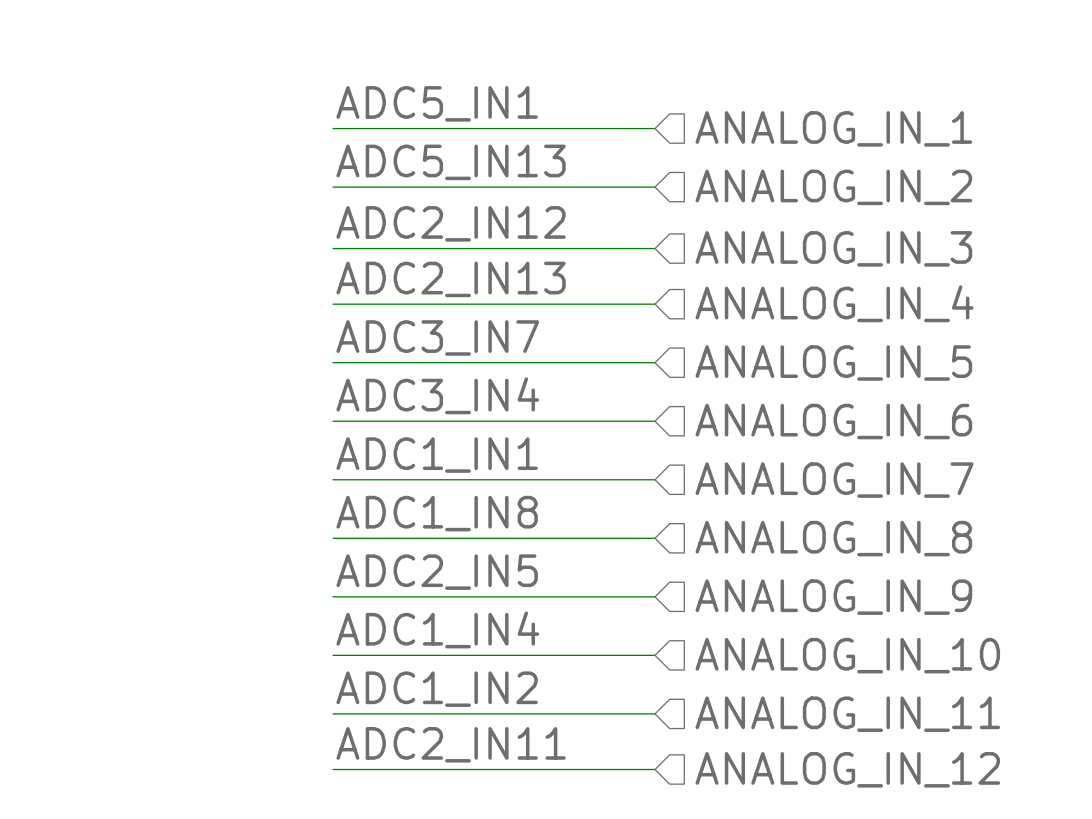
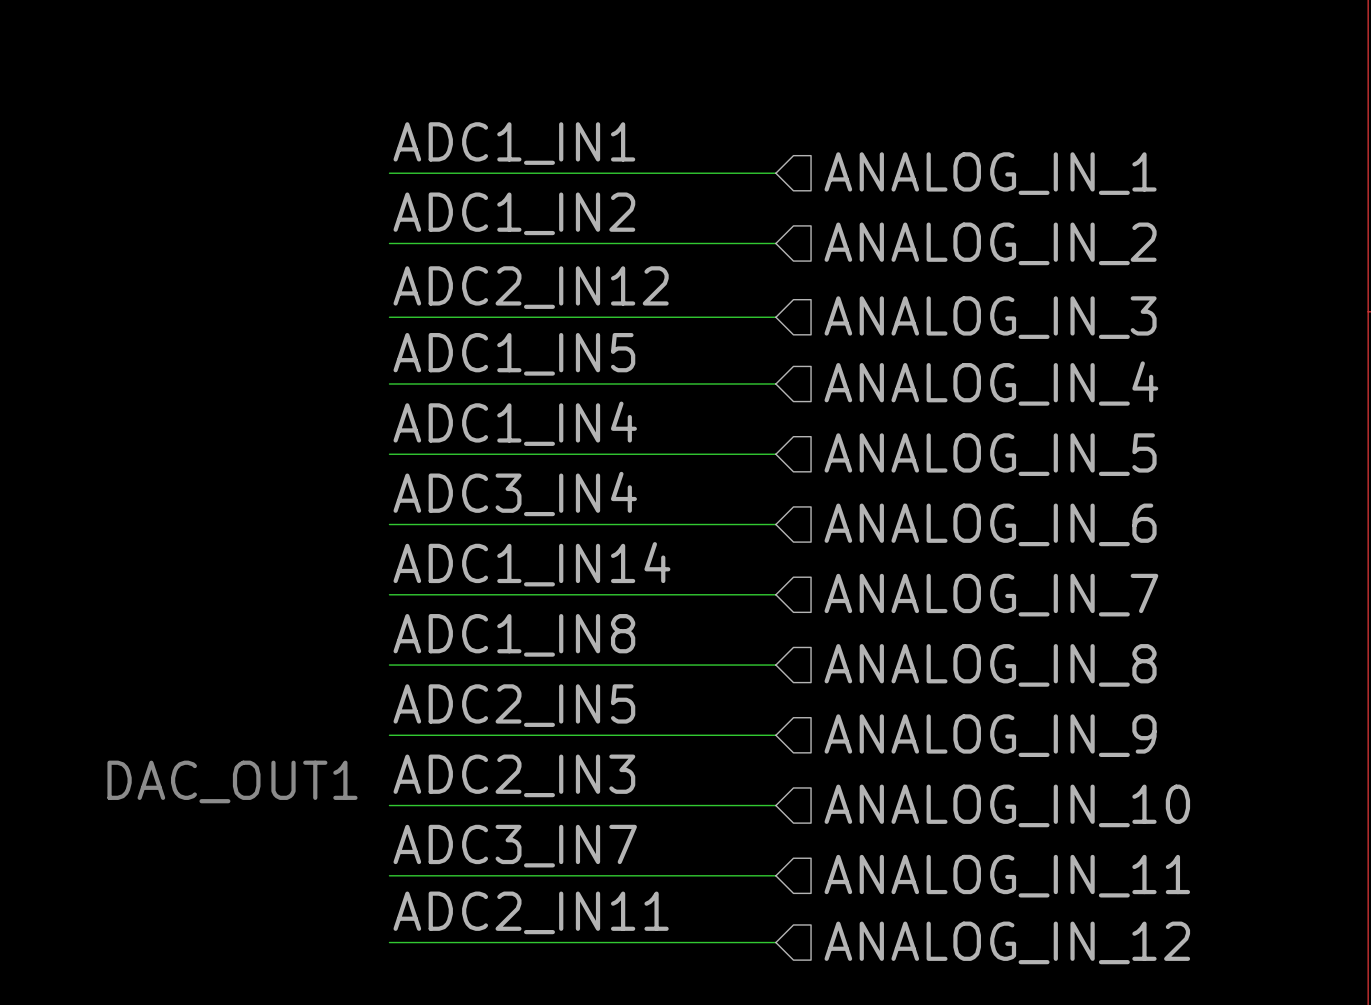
label: ADC5_IN1 (437, 103) -> ADC1_IN1 (514, 143)
label: ADC5_IN13 (451, 162) -> ADC1_IN2 (514, 213)
label: ADC2_IN13 (451, 279) -> ADC1_IN5 (514, 354)
label: ADC3_IN7 (437, 337) -> ADC1_IN4 (515, 423)
label: ADC1_IN1 (437, 455) -> ADC1_IN14 (531, 564)
label: ADC1_IN4 (437, 629) -> ADC2_IN3 (514, 775)
text: none -> DAC_OUT1 (232, 781)
label: ADC1_IN2 (437, 689) -> ADC3_IN7 (515, 846)

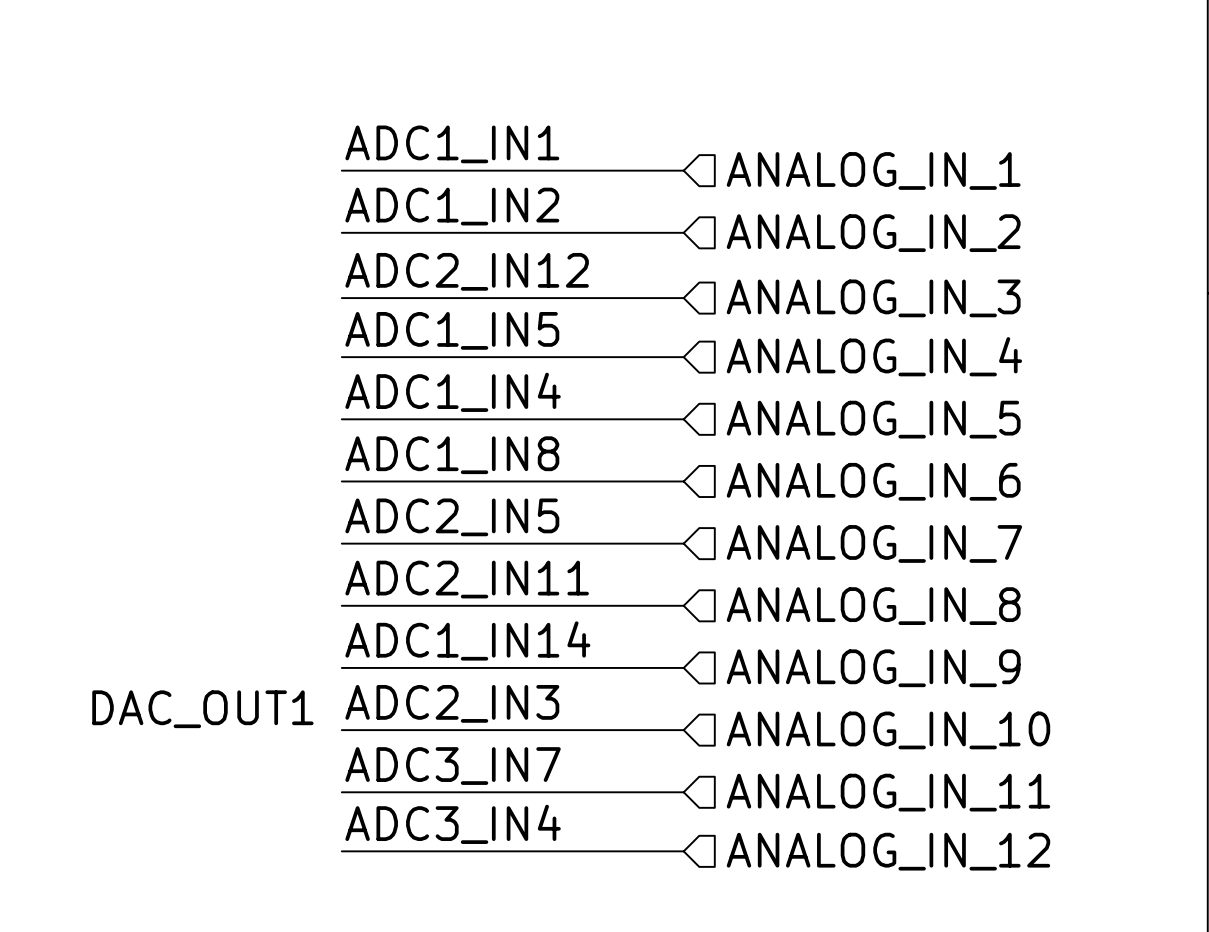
label: ADC3_IN4 (515, 494) -> ADC1_IN8 (452, 455)
label: ADC1_IN14 (531, 564) -> ADC2_IN5 (452, 517)
label: ADC1_IN8 (514, 635) -> ADC2_IN11 (467, 579)
label: ADC2_IN5 (514, 705) -> ADC1_IN14 (467, 640)
label: ADC2_IN11 (531, 912) -> ADC3_IN4 (453, 824)

